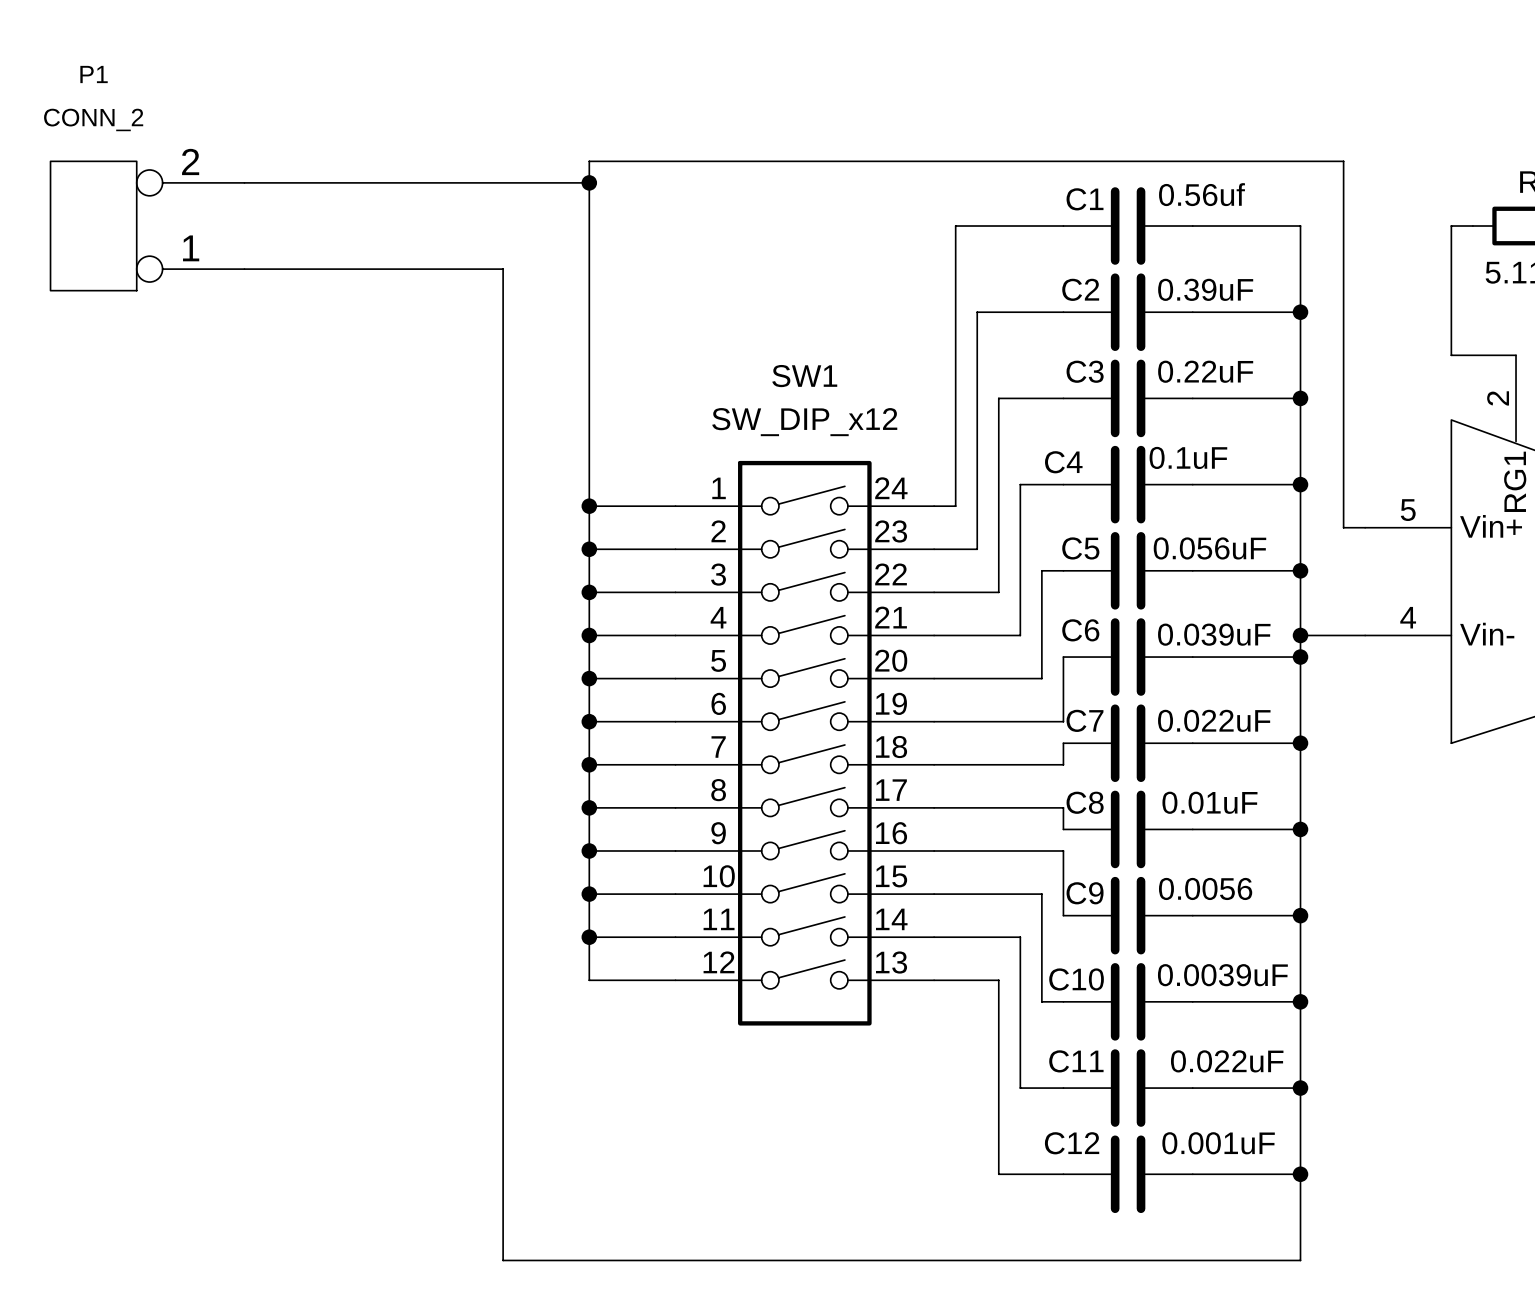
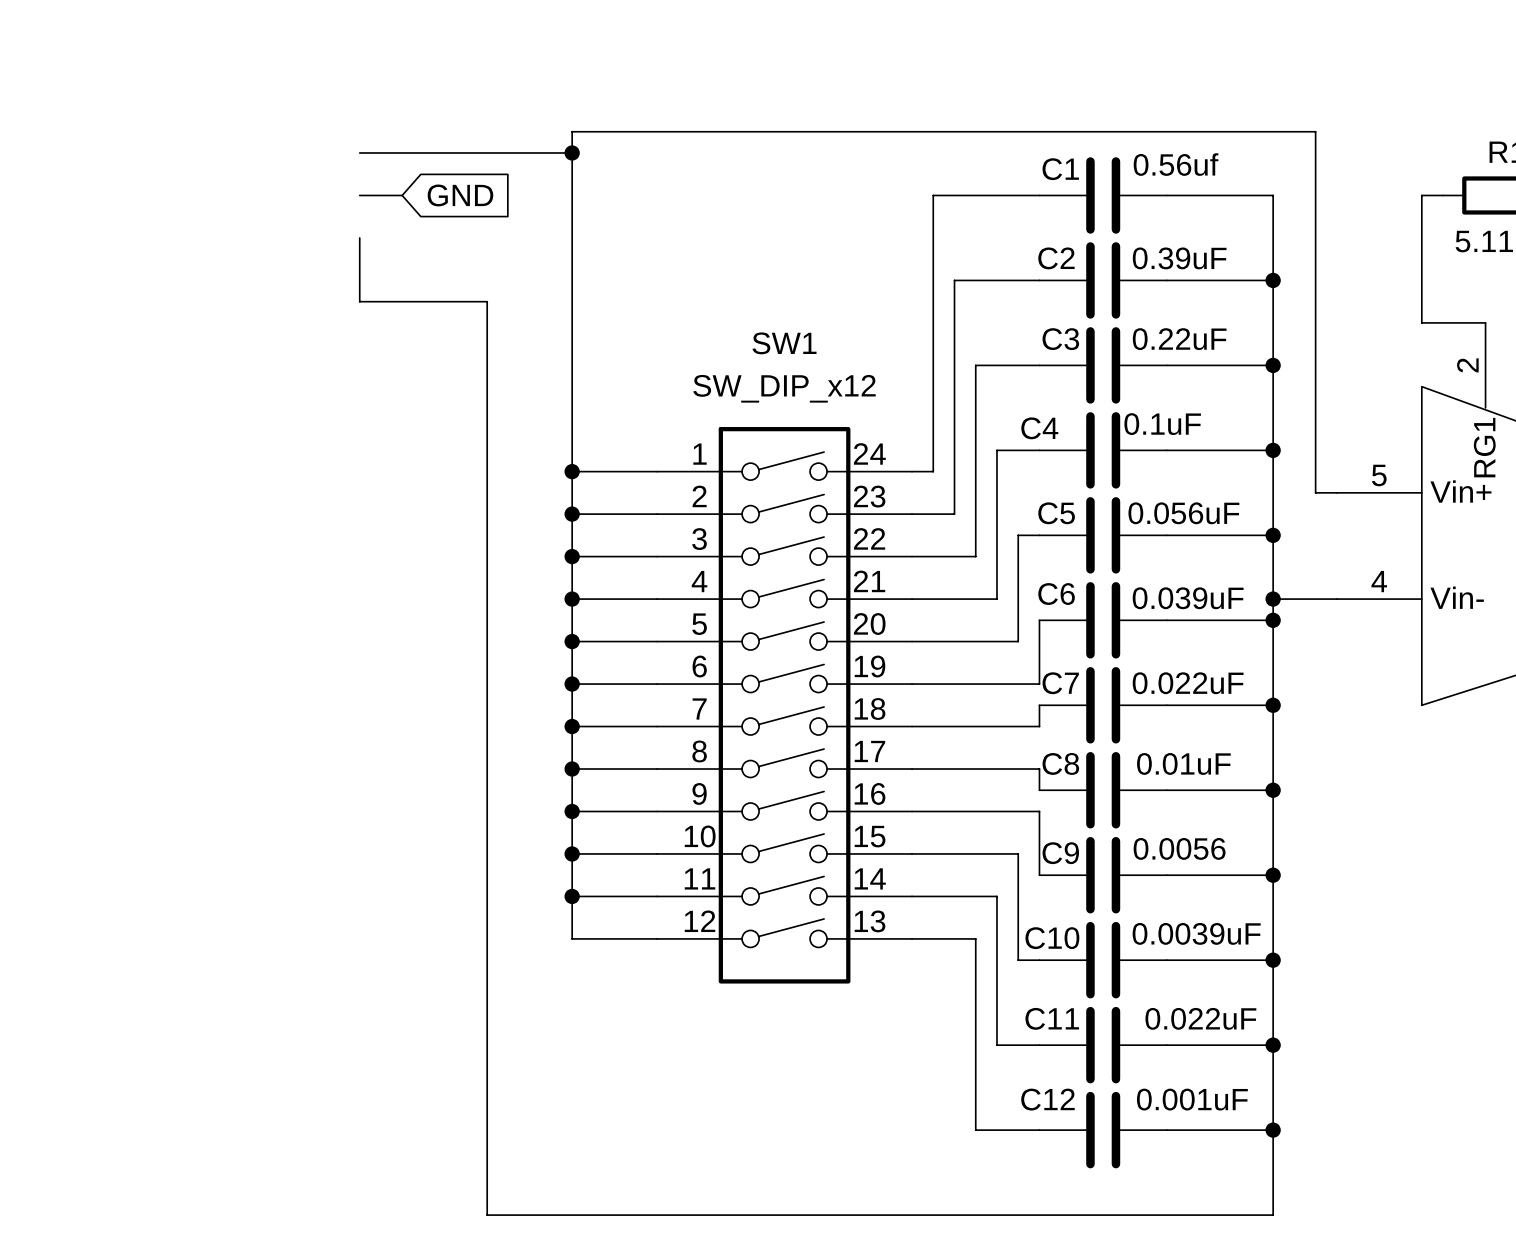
wire: (244, 182) (373, 182) -> none
global label: none -> GND (460, 195)
P1: CONN_2 (147, 226) -> none
wire: none -> (359, 195) (402, 195)
wire: (244, 269) (503, 269) (503, 333) -> (359, 237) (359, 301) (487, 301)

